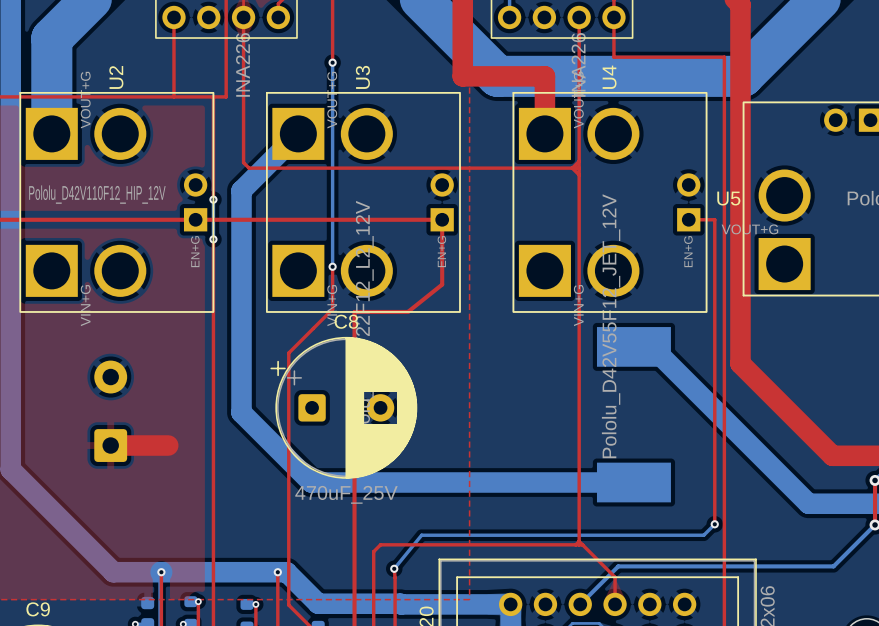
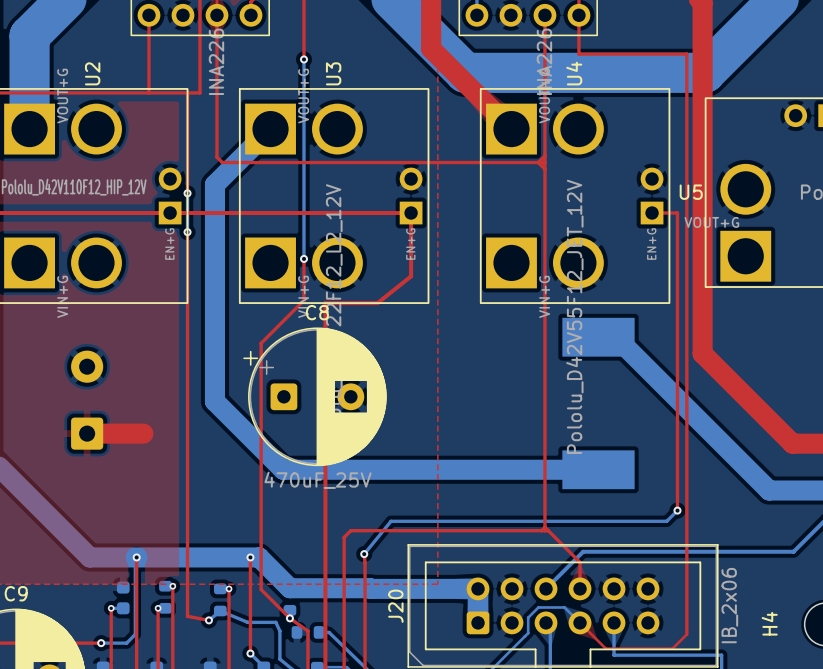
top track: (462, 51) (462, 76) (544, 76) (544, 133) -> (431, 48) (511, 129)

